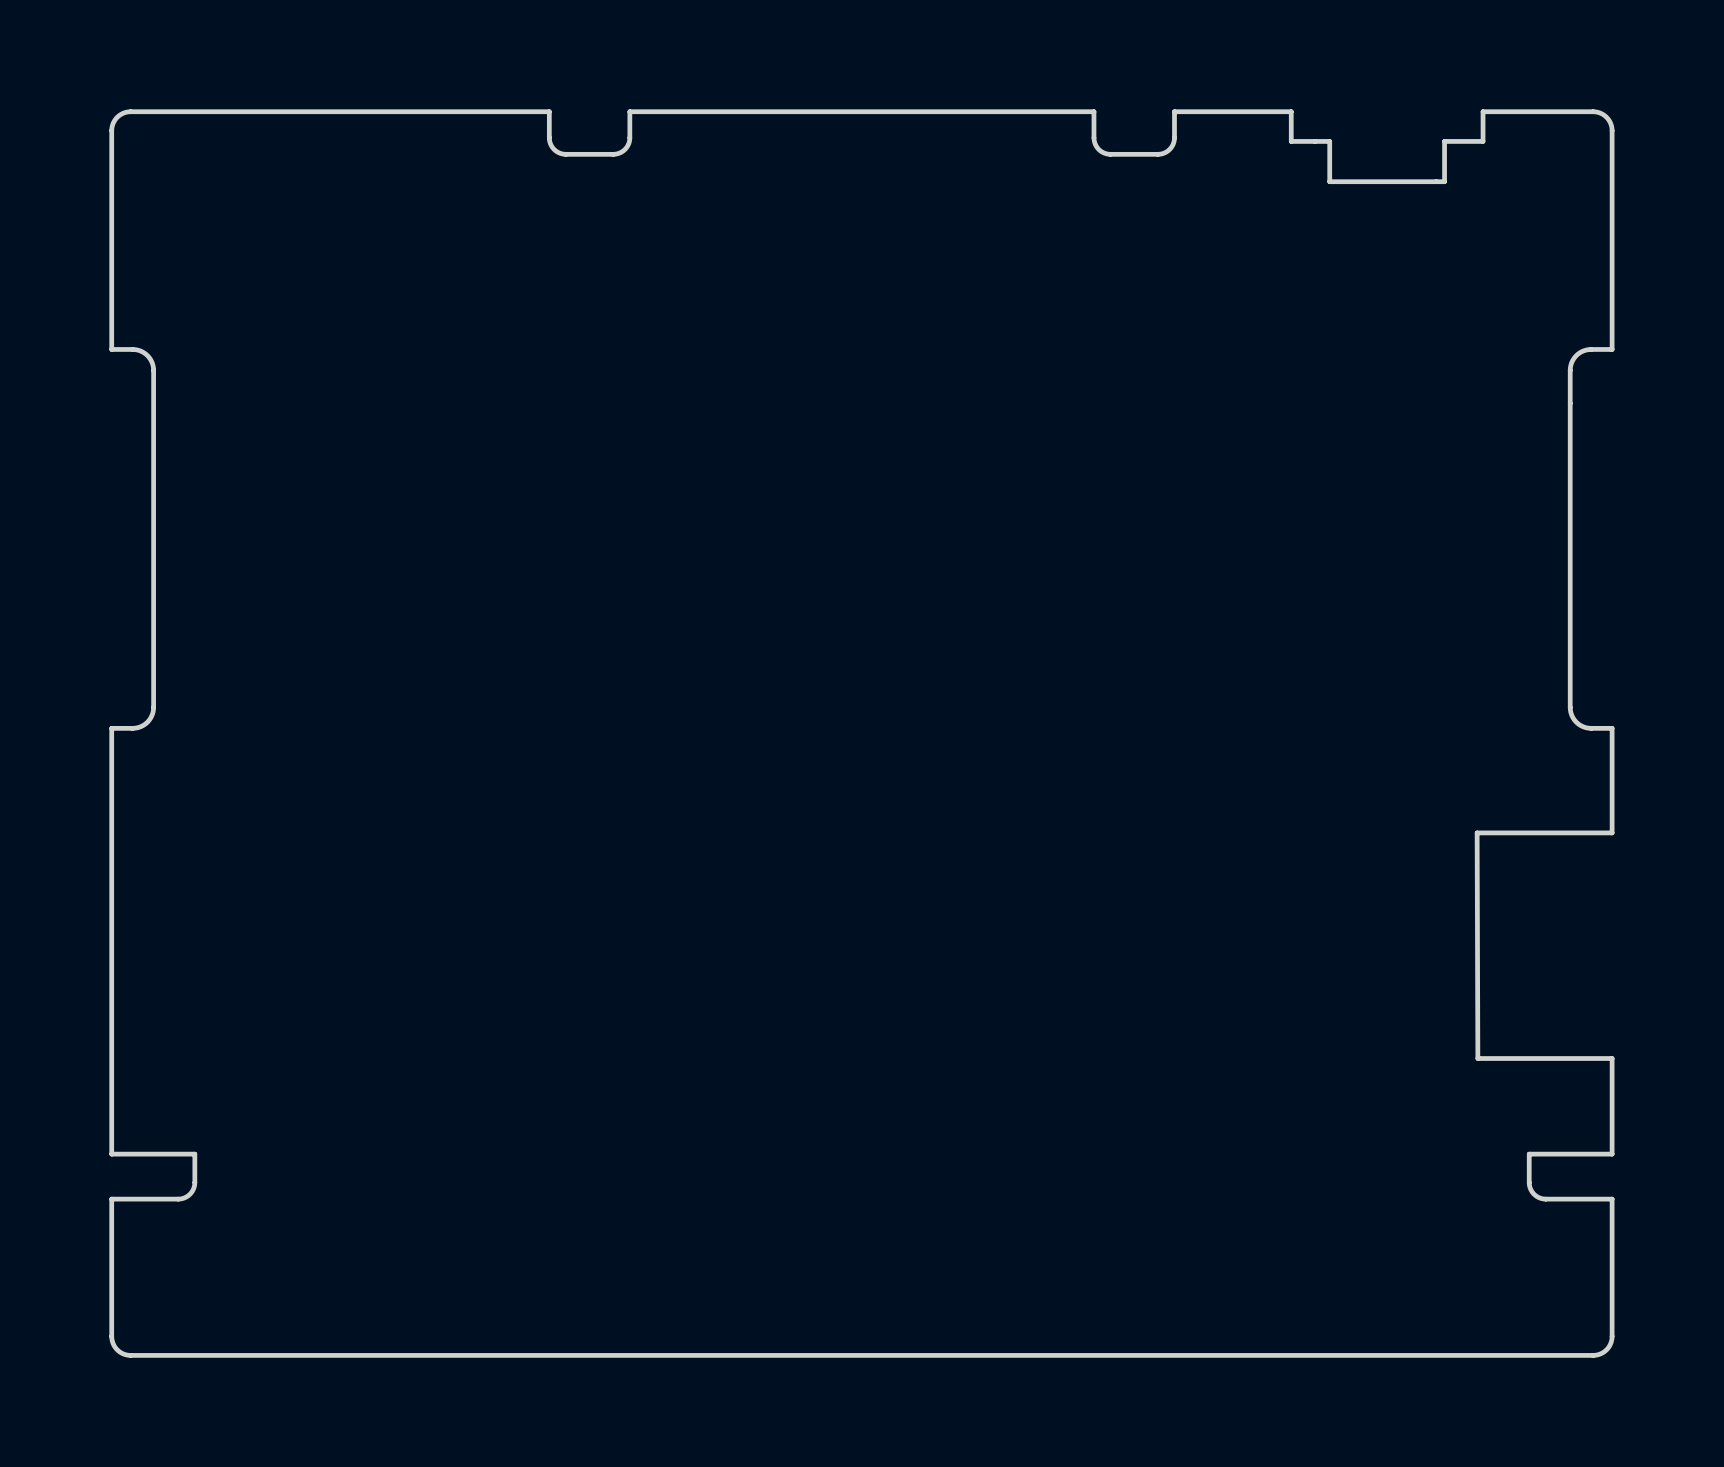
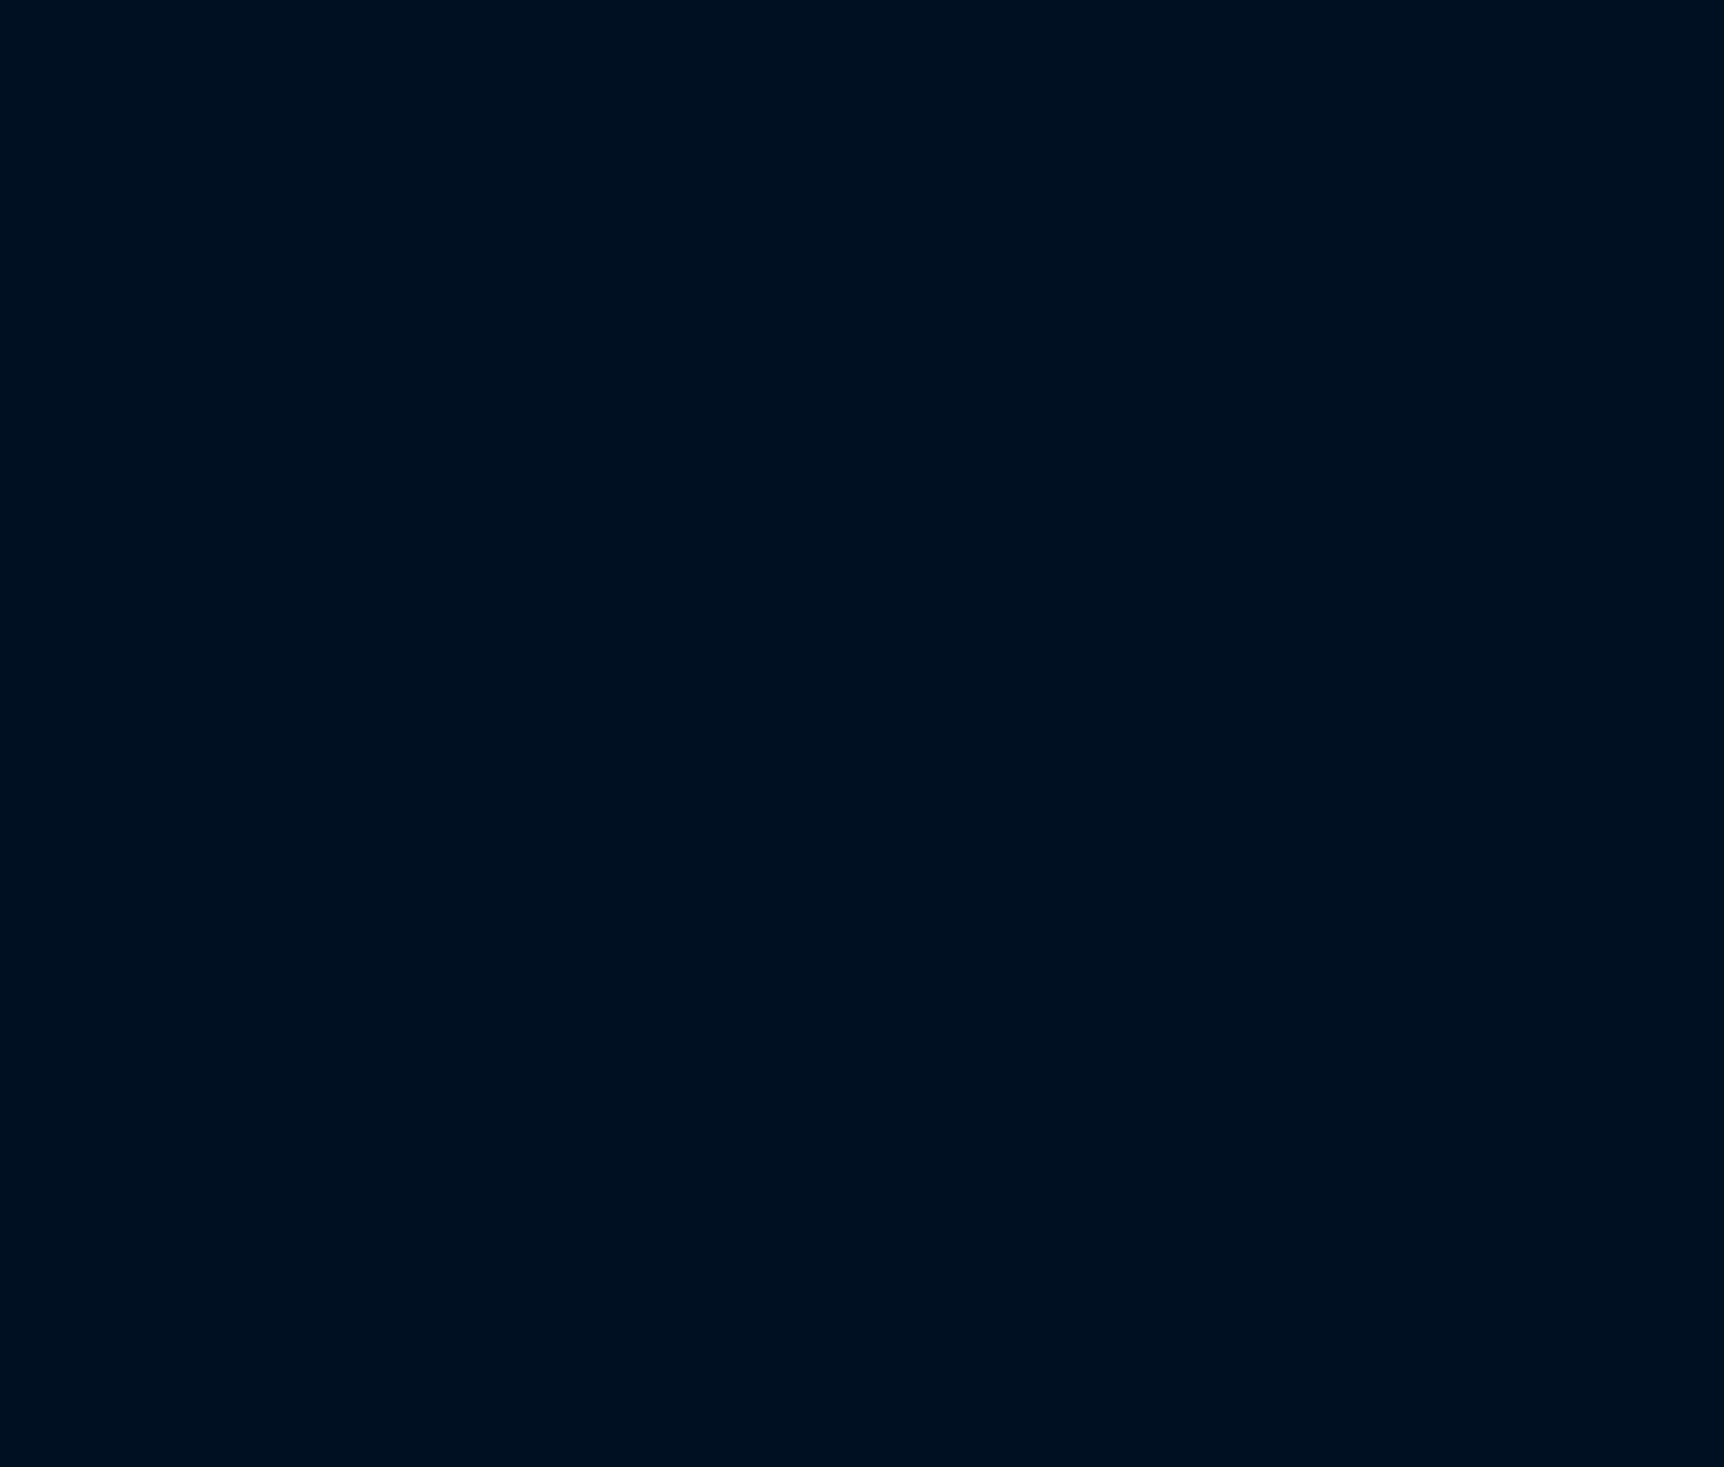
board edge: (1477, 832) (1477, 1058) (1612, 1058) (1612, 1154) (1529, 1154) (1529, 1186) (1532, 1192) (1538, 1197) (1612, 1199) (1611, 1338) (1607, 1348) (1599, 1354) (130, 1355) (122, 1353) (115, 1348) (111, 1338) (111, 1199) (185, 1197) (191, 1192) (194, 1186) (194, 1154) (111, 1154) (111, 728) (135, 728) (143, 725) (150, 717) (153, 707) (153, 368) (150, 359) (141, 351) (111, 349) (111, 130) (113, 122) (120, 114) (130, 111) (549, 111) (549, 141) (557, 151) (565, 154) (613, 154) (623, 150) (628, 144) (629, 111) (1093, 111) (1094, 141) (1101, 151) (1110, 154) (1157, 154) (1166, 151) (1173, 143) (1174, 111) (1291, 111) (1291, 141) (1329, 141) (1329, 181) (1444, 181) (1444, 141) (1483, 141) (1483, 111) (1593, 111) (1601, 113) (1609, 120) (1612, 130) (1612, 349) (1582, 351) (1574, 357) (1570, 368) (1570, 707) (1573, 717) (1580, 725) (1588, 728) (1612, 728) (1612, 832) (1477, 832) -> none

